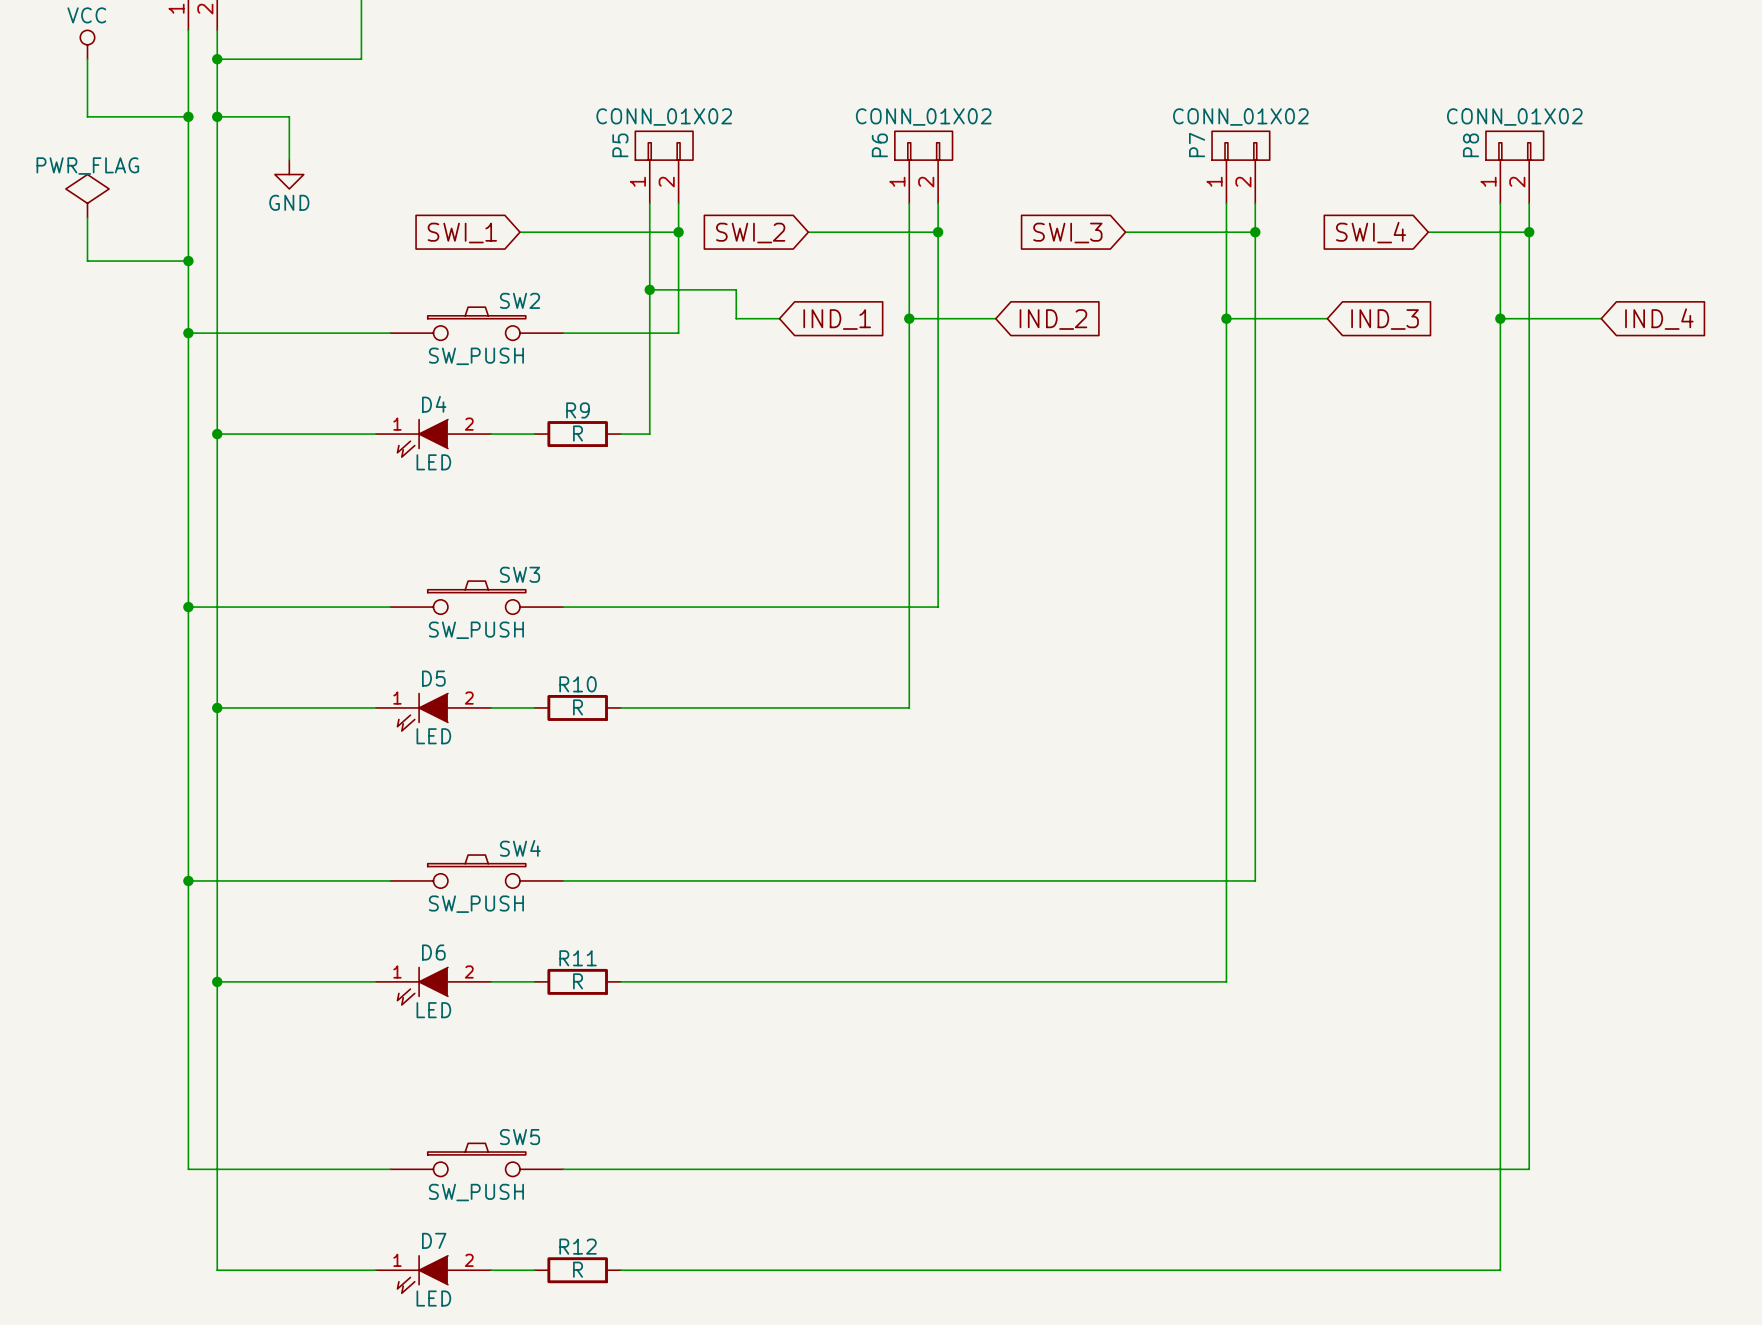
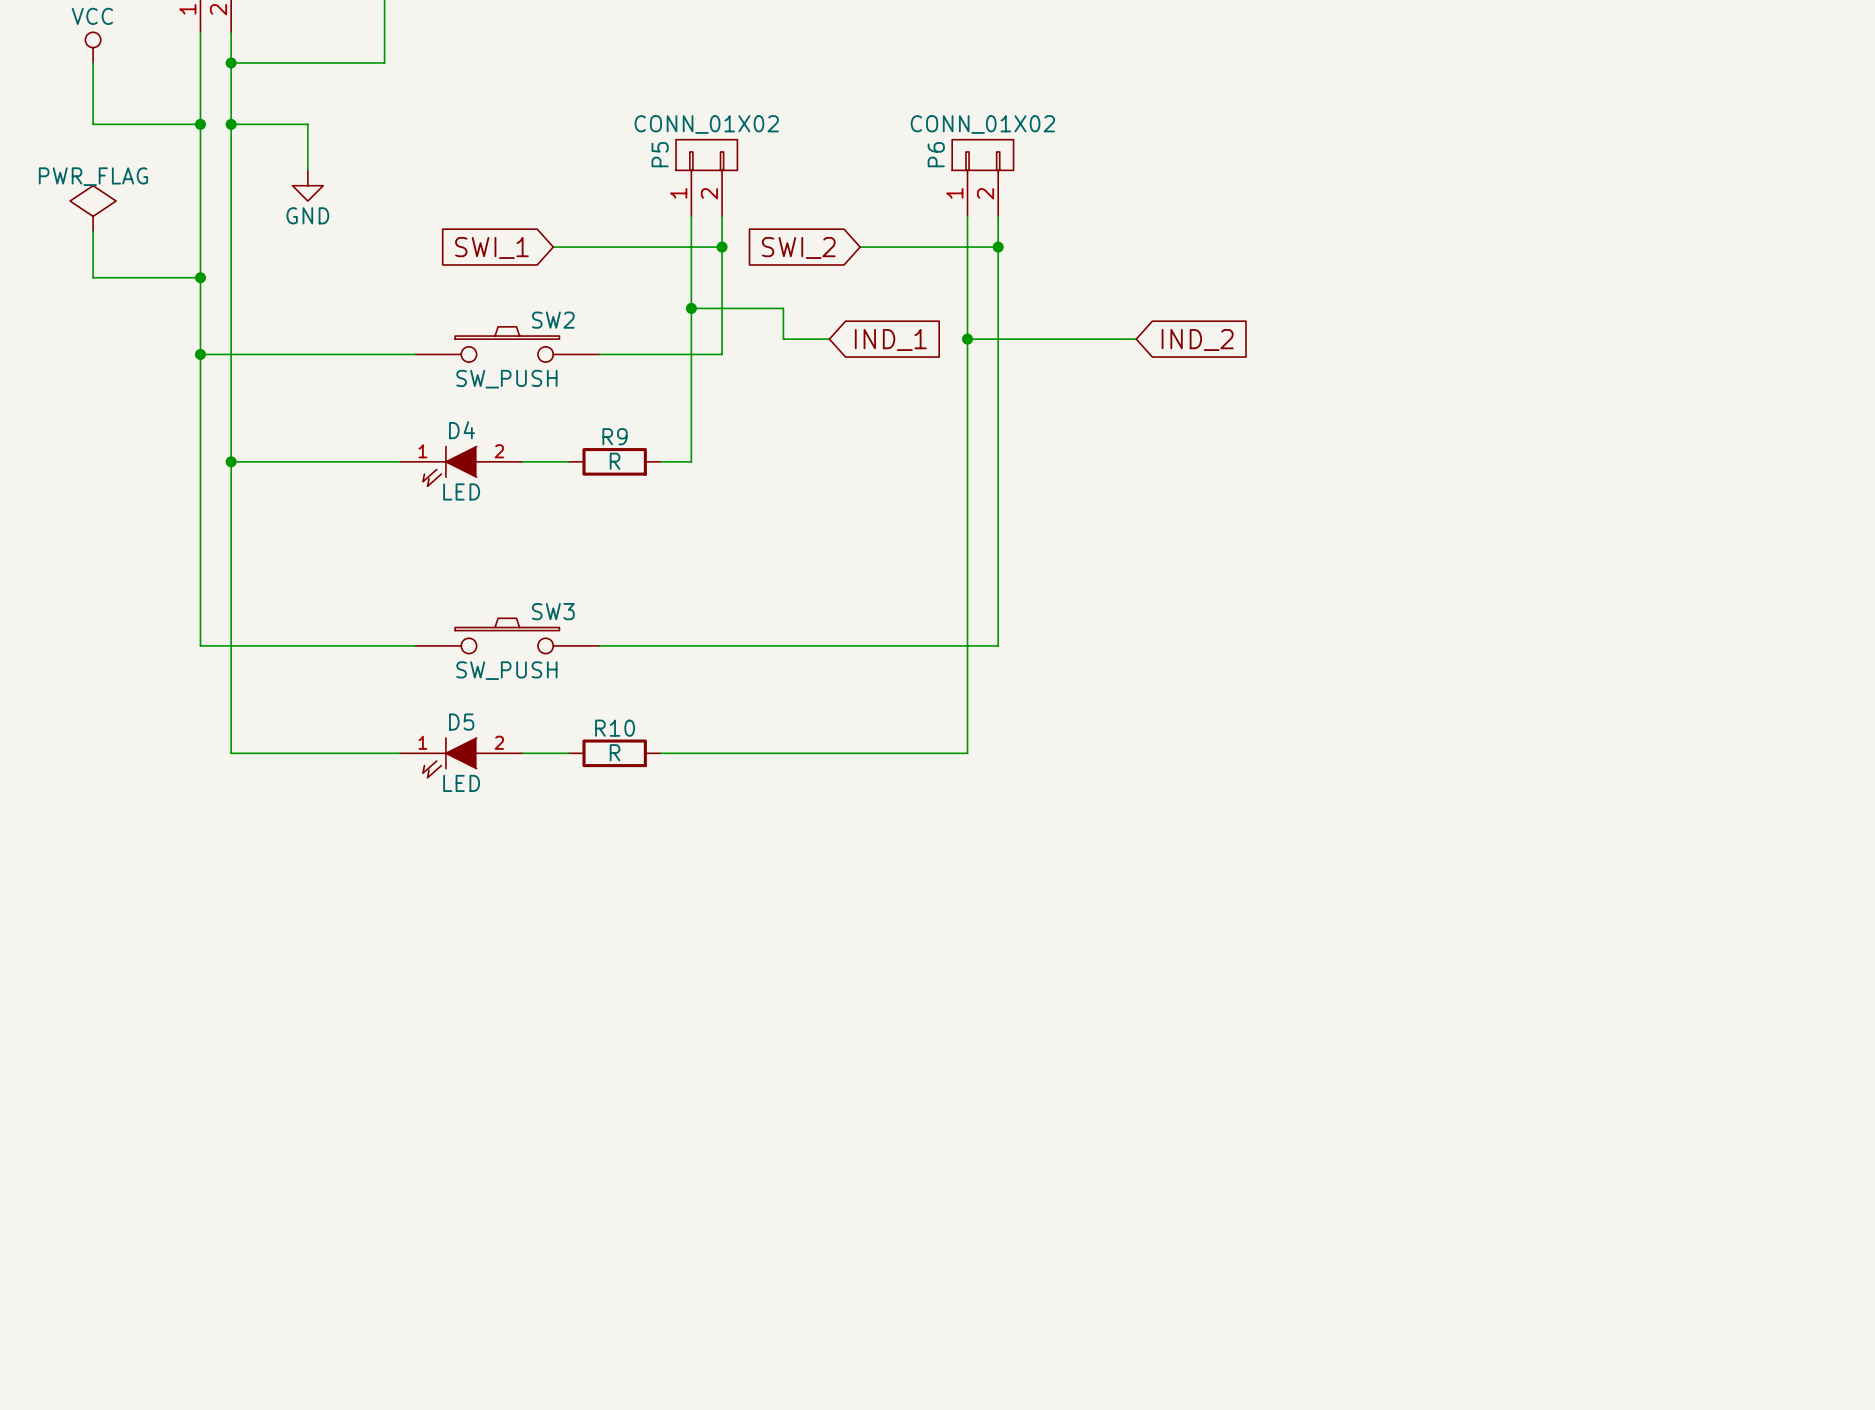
P7: CONN_01X02 (1240, 167) -> none
P8: CONN_01X02 (1514, 167) -> none
wire: (1226, 203) (1226, 981) (620, 981) -> none
wire: (1255, 203) (1255, 880) (563, 880) -> none
wire: (1500, 203) (1500, 1270) (620, 1270) -> none
wire: (1529, 203) (1529, 1169) (563, 1169) -> none
wire: (1125, 232) (1255, 232) -> none
junction: (1255, 232) -> none
global label: SWI_4 (1371, 232) -> none
wire: (1428, 232) (1529, 232) -> none
junction: (1529, 232) -> none
global label: SWI_3 (1067, 233) -> none
wire: none -> (1059, 339) (1136, 339)
wire: (1226, 318) (1327, 318) -> none
junction: (1226, 318) -> none
wire: (1500, 318) (1601, 318) -> none
junction: (1500, 318) -> none
global label position: IND_2 (1053, 319) -> IND_2 (1197, 339)
global label: IND_3 (1385, 319) -> none
global label: IND_4 (1659, 319) -> none
wire: (188, 607) (188, 1169) (390, 1169) -> none
junction: (188, 607) -> none
wire: (217, 707) (217, 1270) (375, 1270) -> none
junction: (217, 707) -> none
SW4: SW_PUSH (476, 871) -> none
wire: (188, 880) (390, 880) -> none
junction: (188, 880) -> none
wire: (217, 981) (375, 981) -> none
junction: (217, 981) -> none
wire: (491, 981) (534, 981) -> none
R11: R (577, 981) -> none
D6: LED (433, 986) -> none
SW5: SW_PUSH (476, 1159) -> none
wire: (491, 1270) (534, 1270) -> none
R12: R (577, 1270) -> none
D7: LED (433, 1274) -> none

